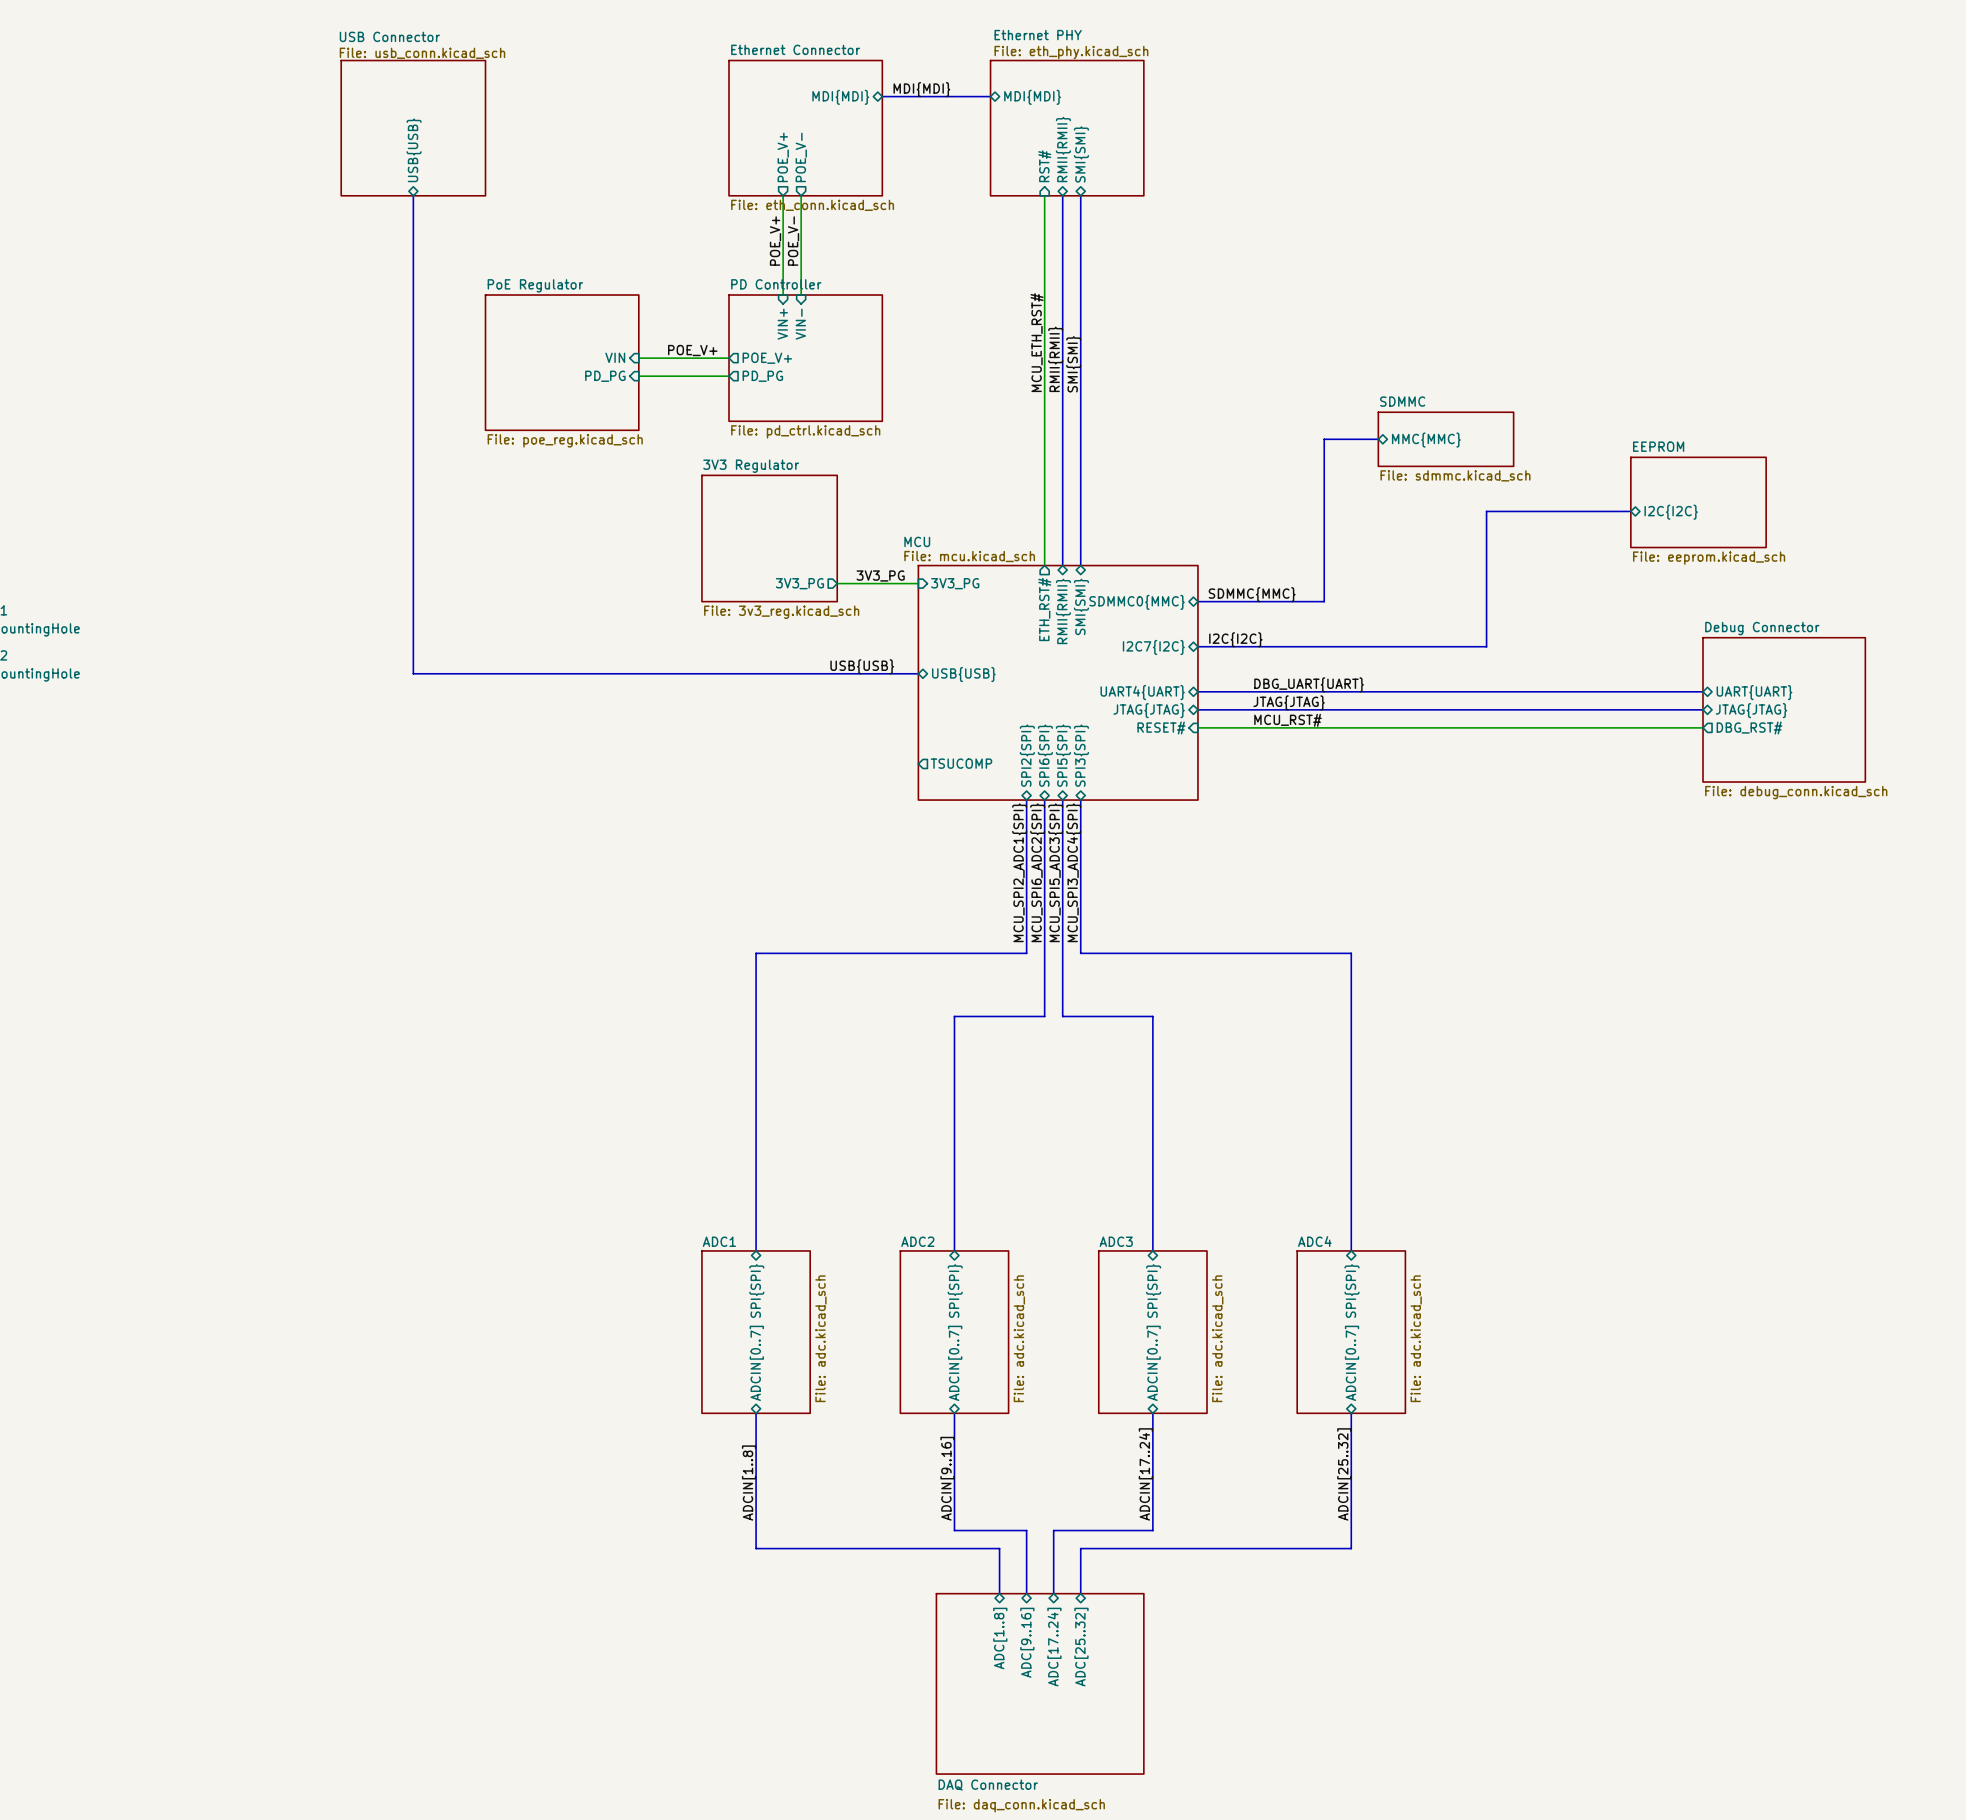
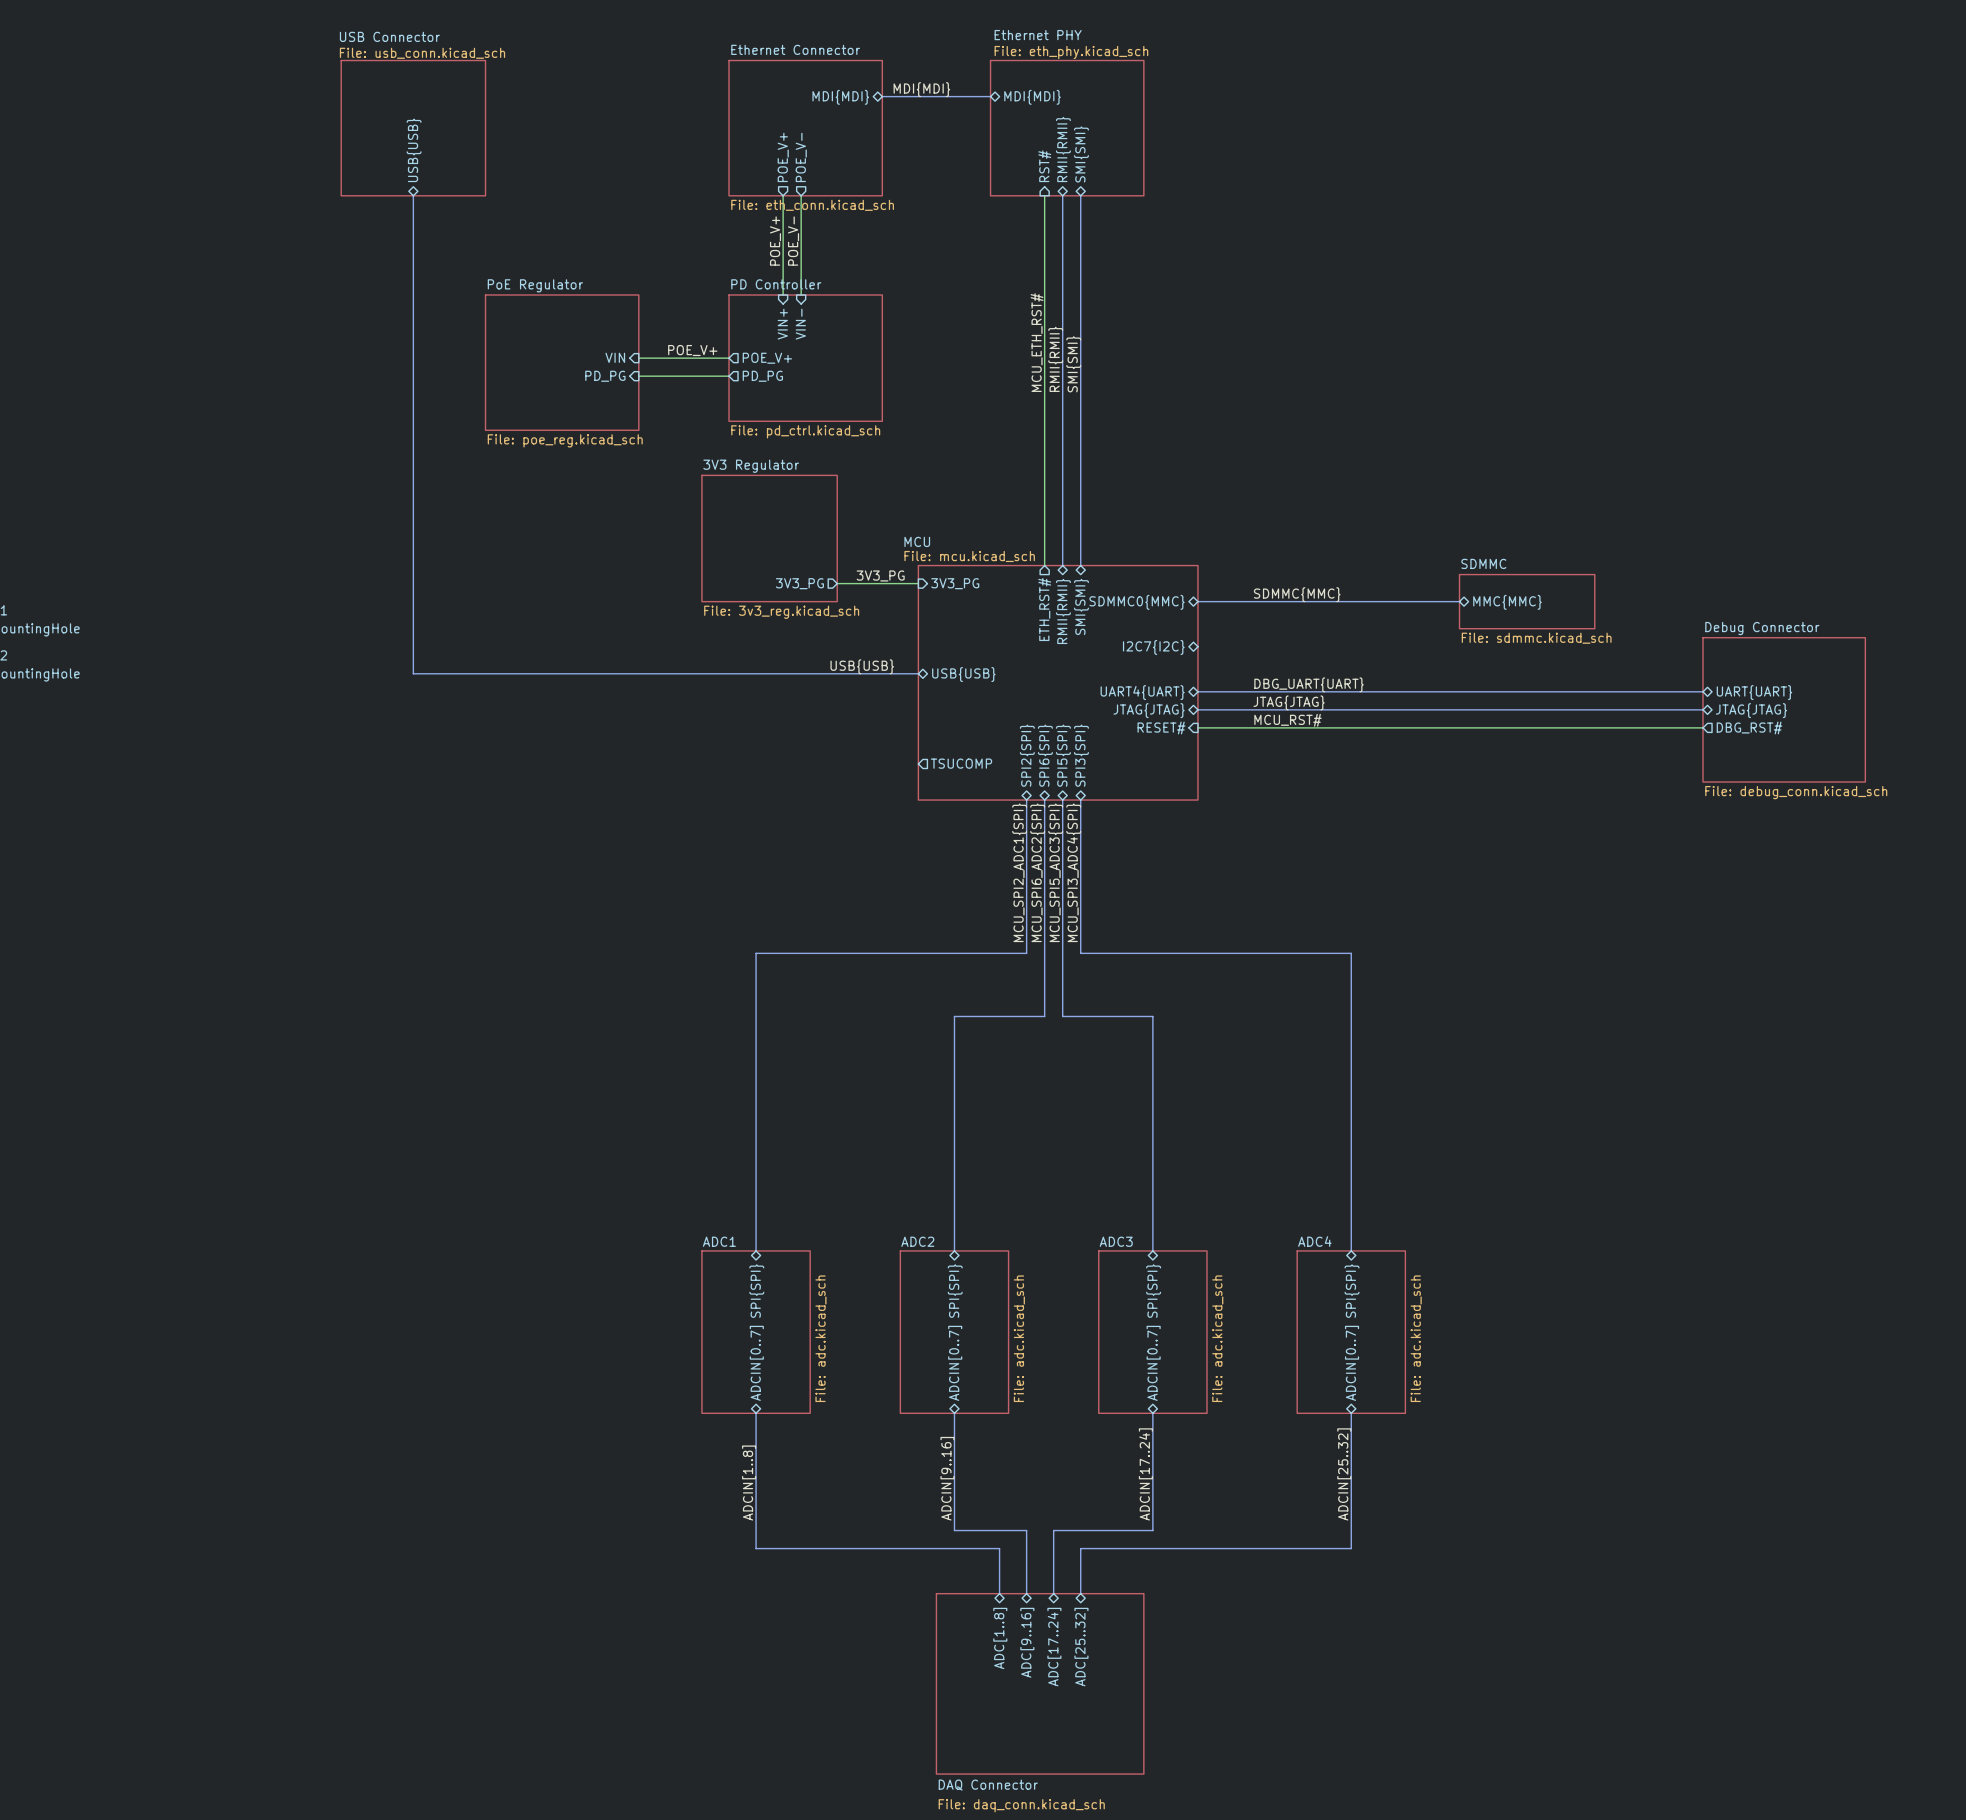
bus: (1378, 439) (1324, 439) (1324, 601) -> (1459, 601) (1324, 601)
sheet SDMMC: File: sdmmc.kicad_sch (1445, 439) -> none
sheet pin: MMC{MMC} (1426, 440) -> none
sheet EEPROM: File: eeprom.kicad_sch (1698, 502) -> none
bus: (1630, 511) (1486, 511) (1486, 646) (1197, 646) -> none
sheet pin: I2C{I2C} (1671, 512) -> none
label position: SDMMC{MMC} (1252, 594) -> SDMMC{MMC} (1297, 594)
sheet SDMMC: none -> File: sdmmc.kicad_sch (1527, 601)
sheet pin: none -> MMC{MMC} (1507, 602)
label: I2C{I2C} (1235, 639) -> none

